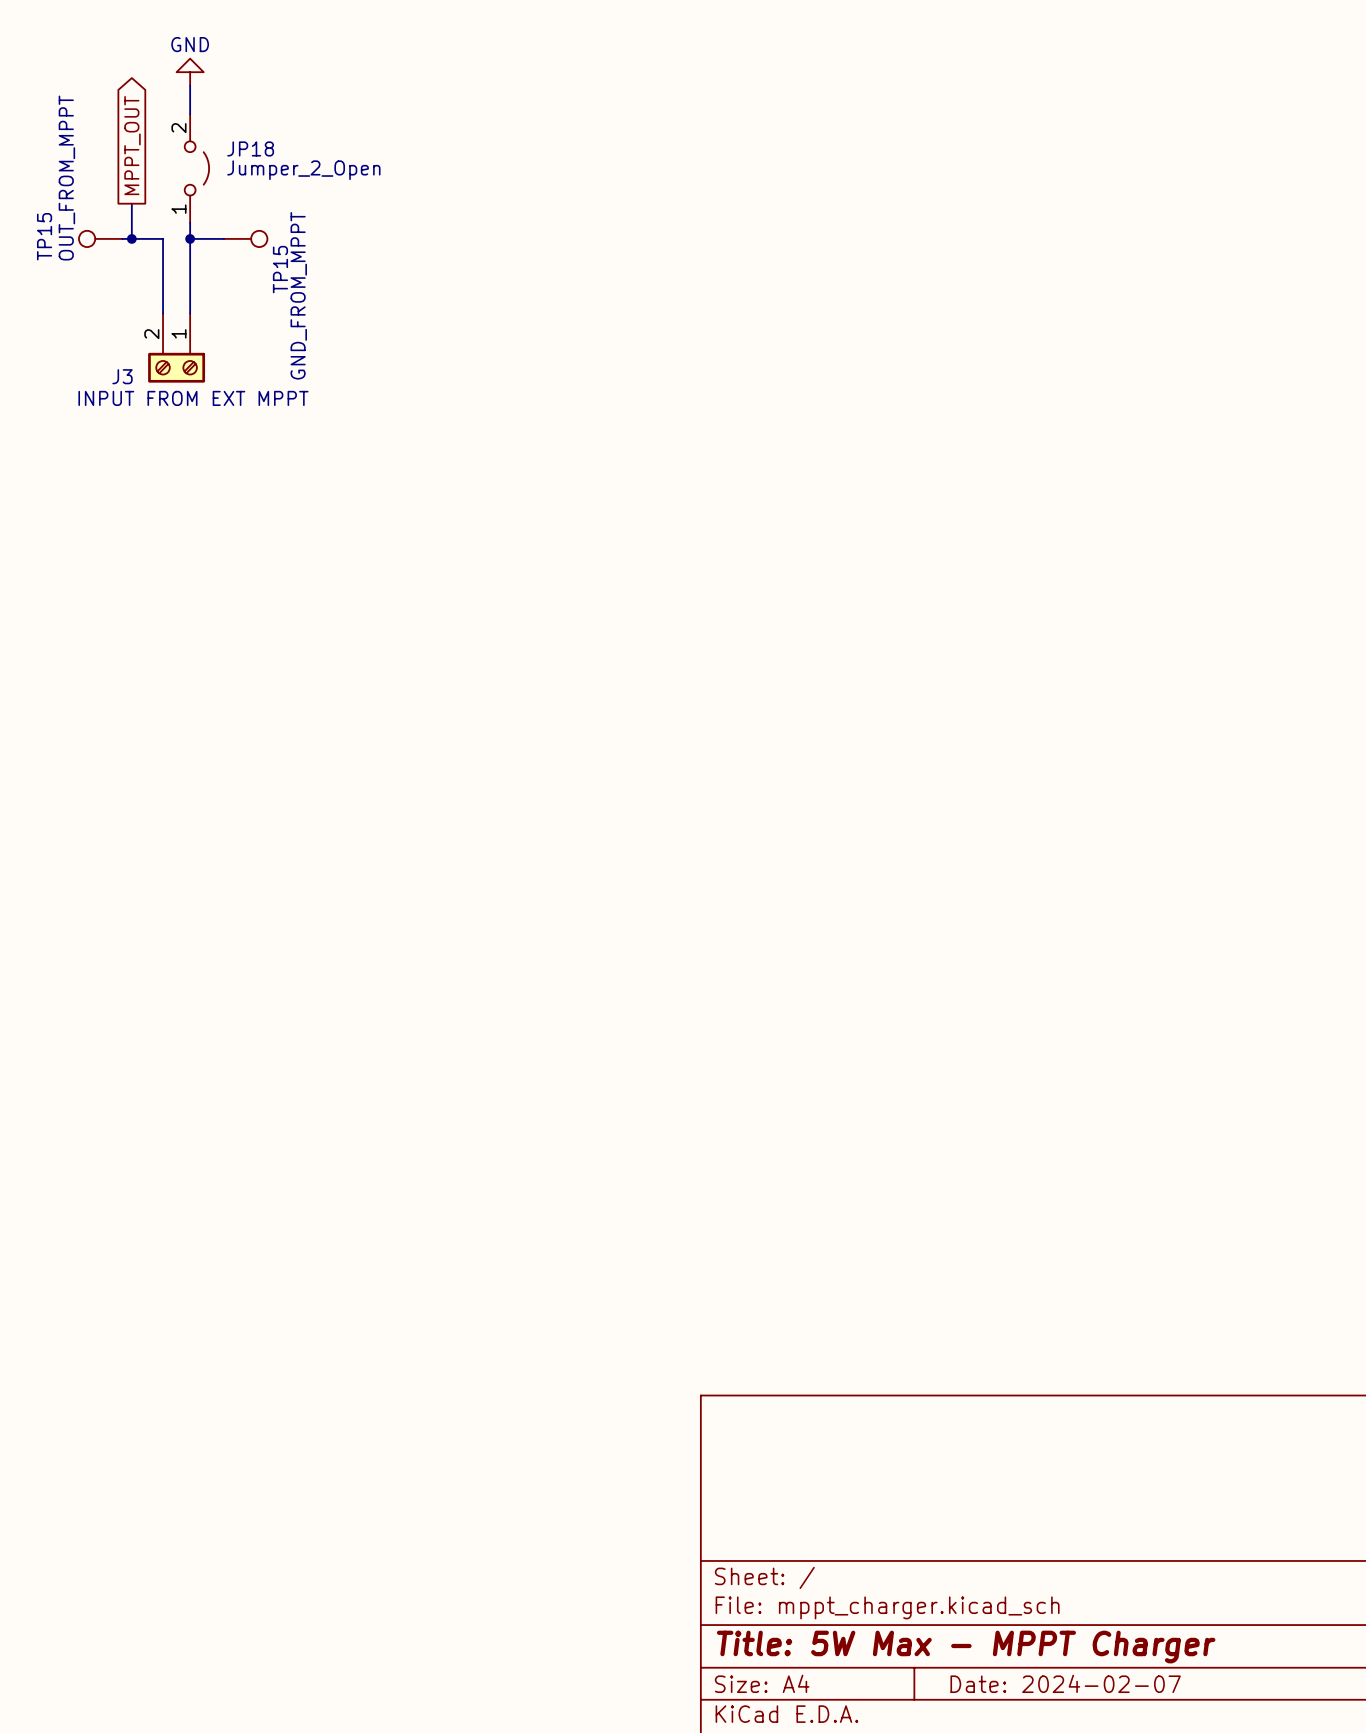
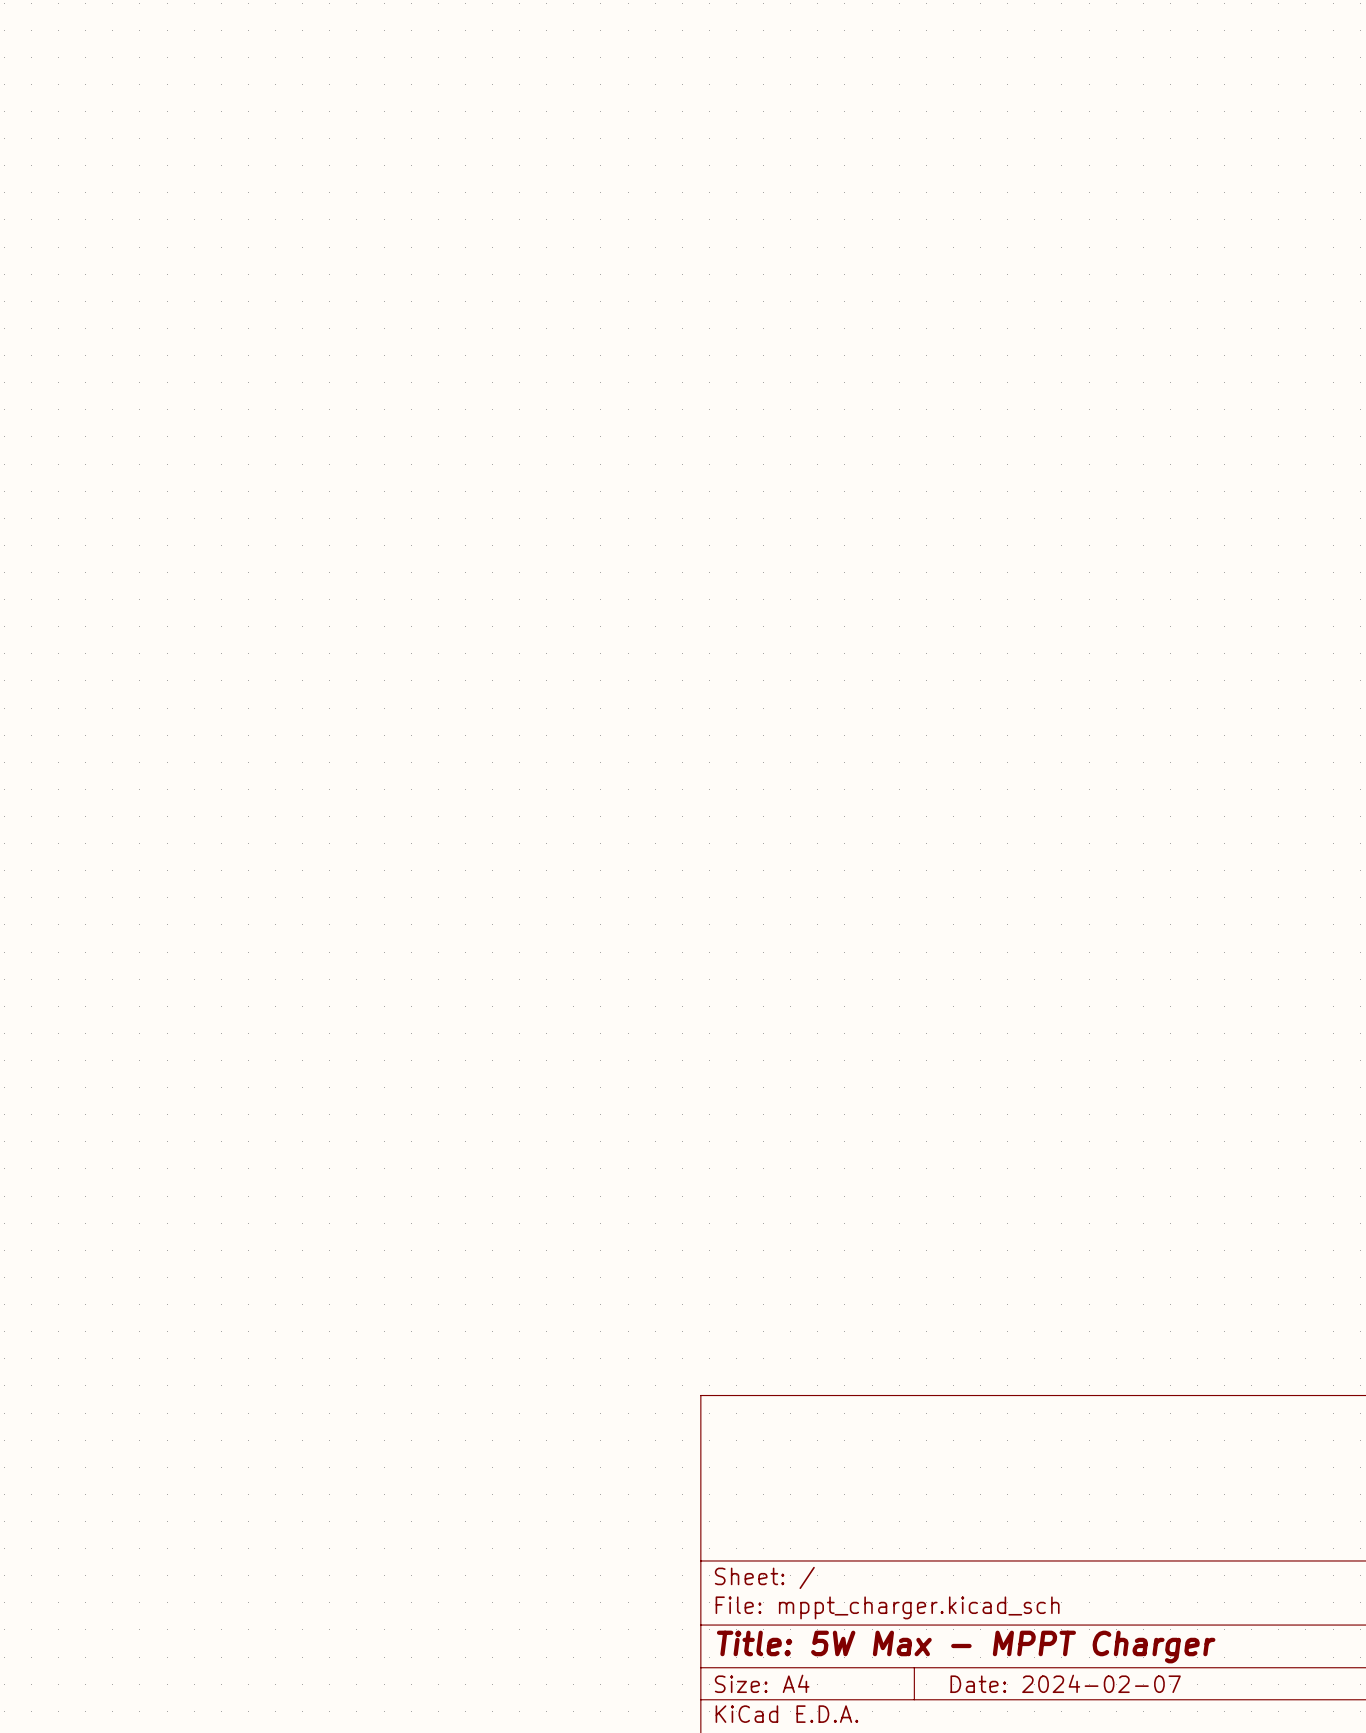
power symbol: GND (190, 72) -> none
wire: (190, 85) (190, 114) -> none
global label: MPPT_OUT (132, 145) -> none
JP18: Jumper_2_Open (196, 168) -> none
wire: (131, 203) (131, 238) -> none
wire: (190, 222) (190, 313) -> none
TP15: OUT_FROM_MPPT (100, 238) -> none
wire: (122, 238) (163, 238) (163, 313) -> none
junction: (131, 238) -> none
wire: (190, 238) (224, 238) -> none
junction: (190, 238) -> none
TP15: GND_FROM_MPPT (245, 238) -> none
J3: INPUT FROM EXT MPPT (176, 348) -> none

